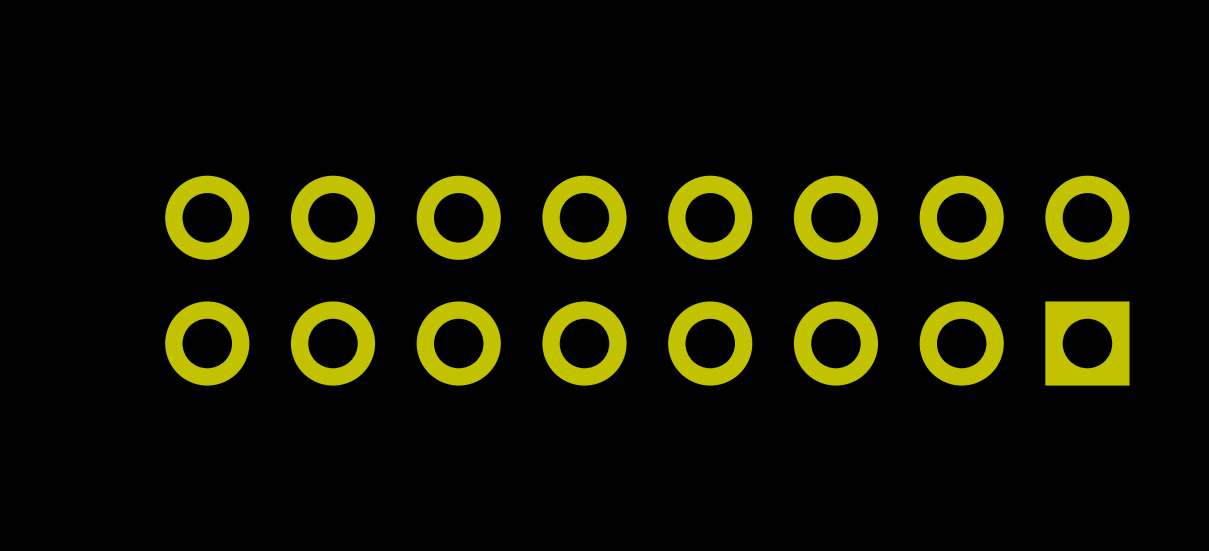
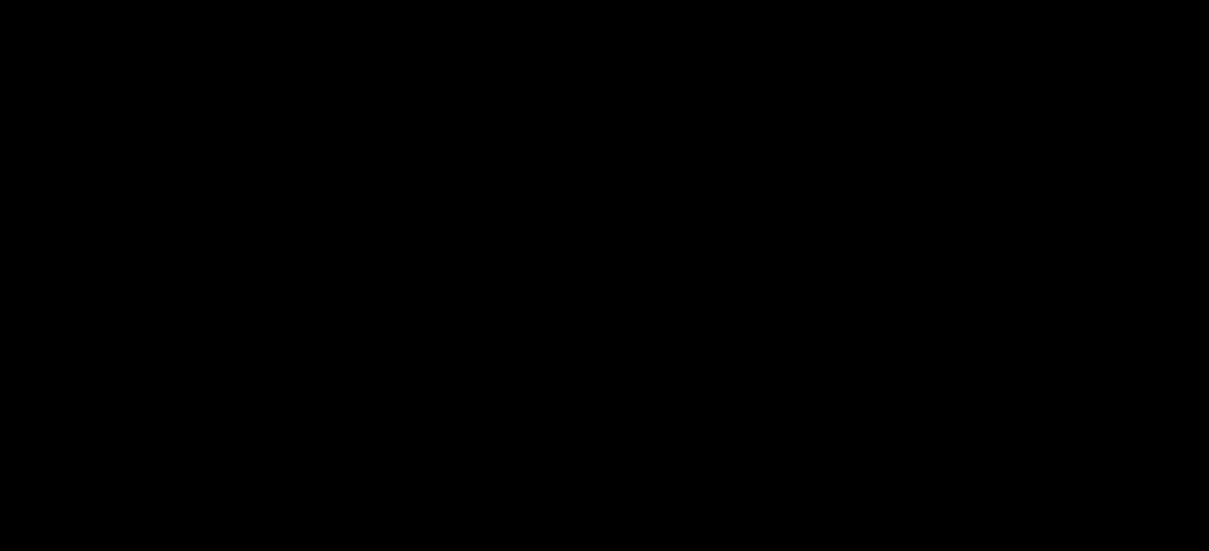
part: (647, 280) -> none

